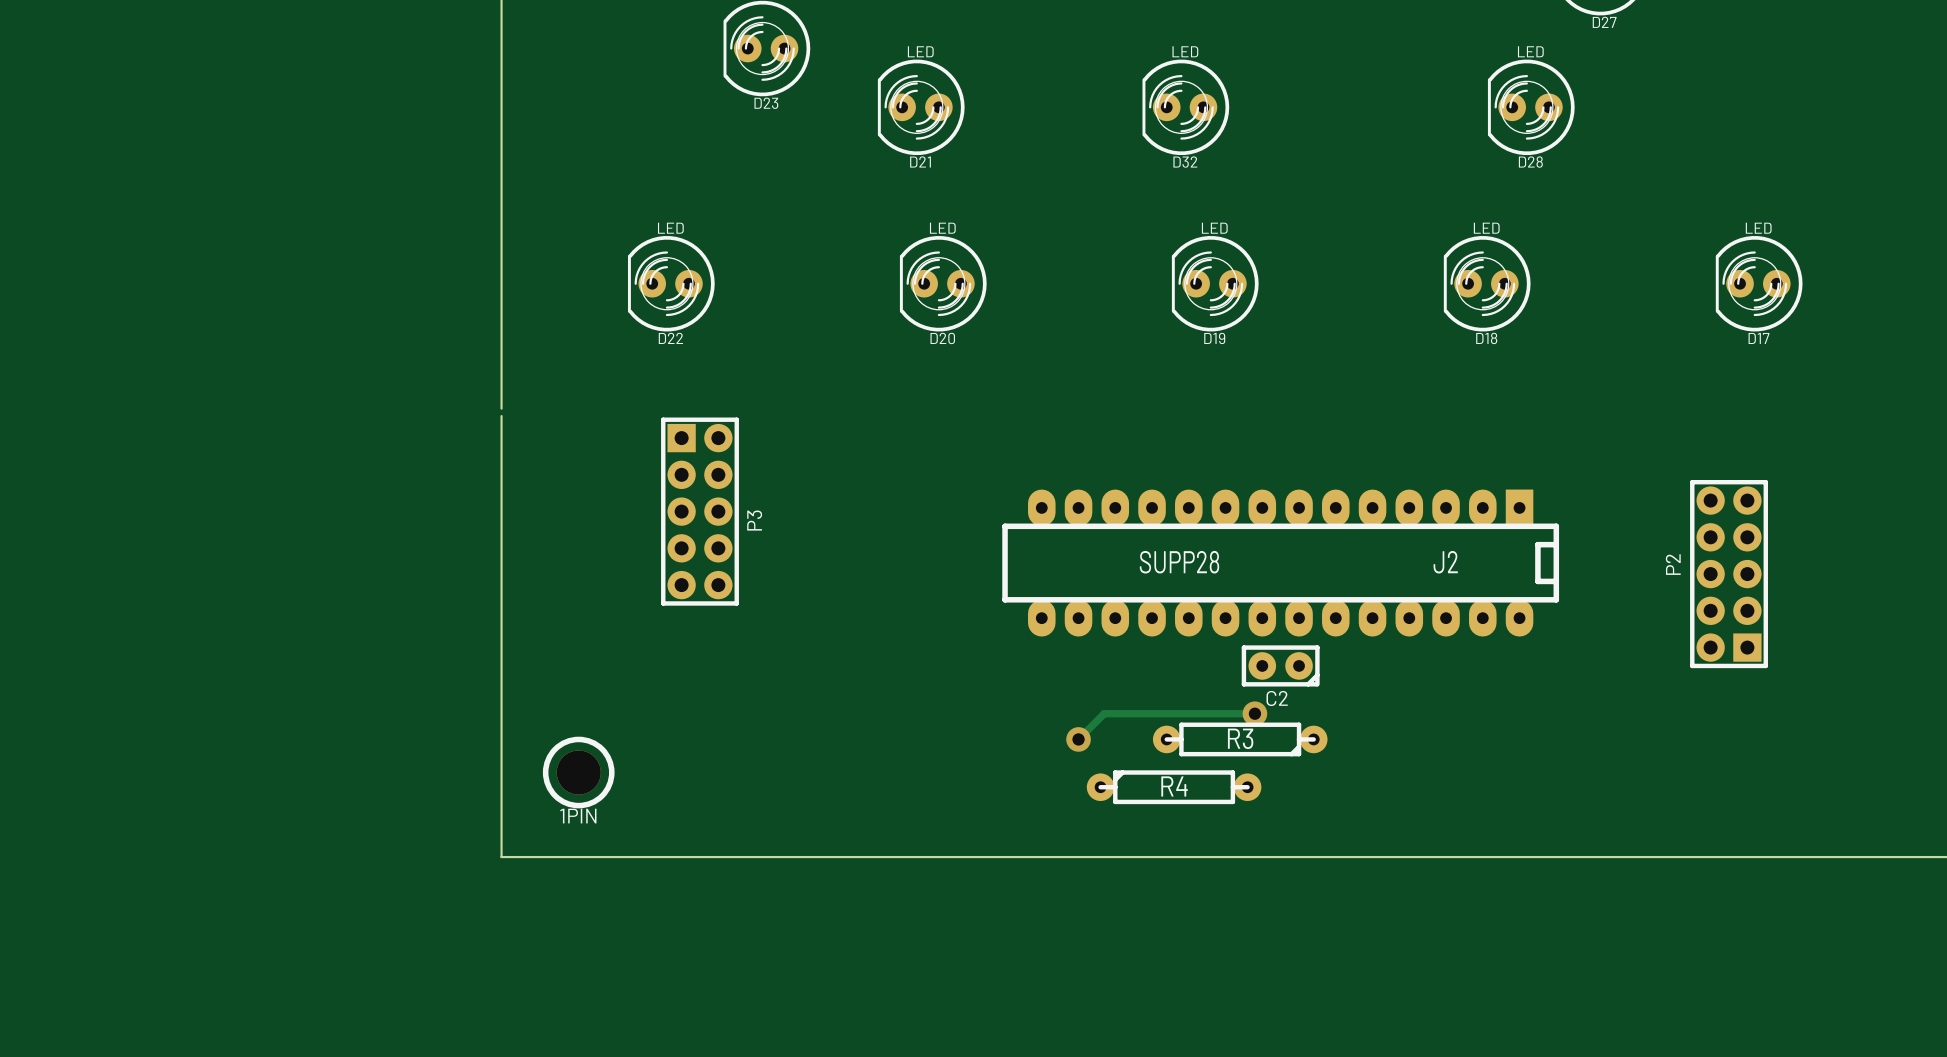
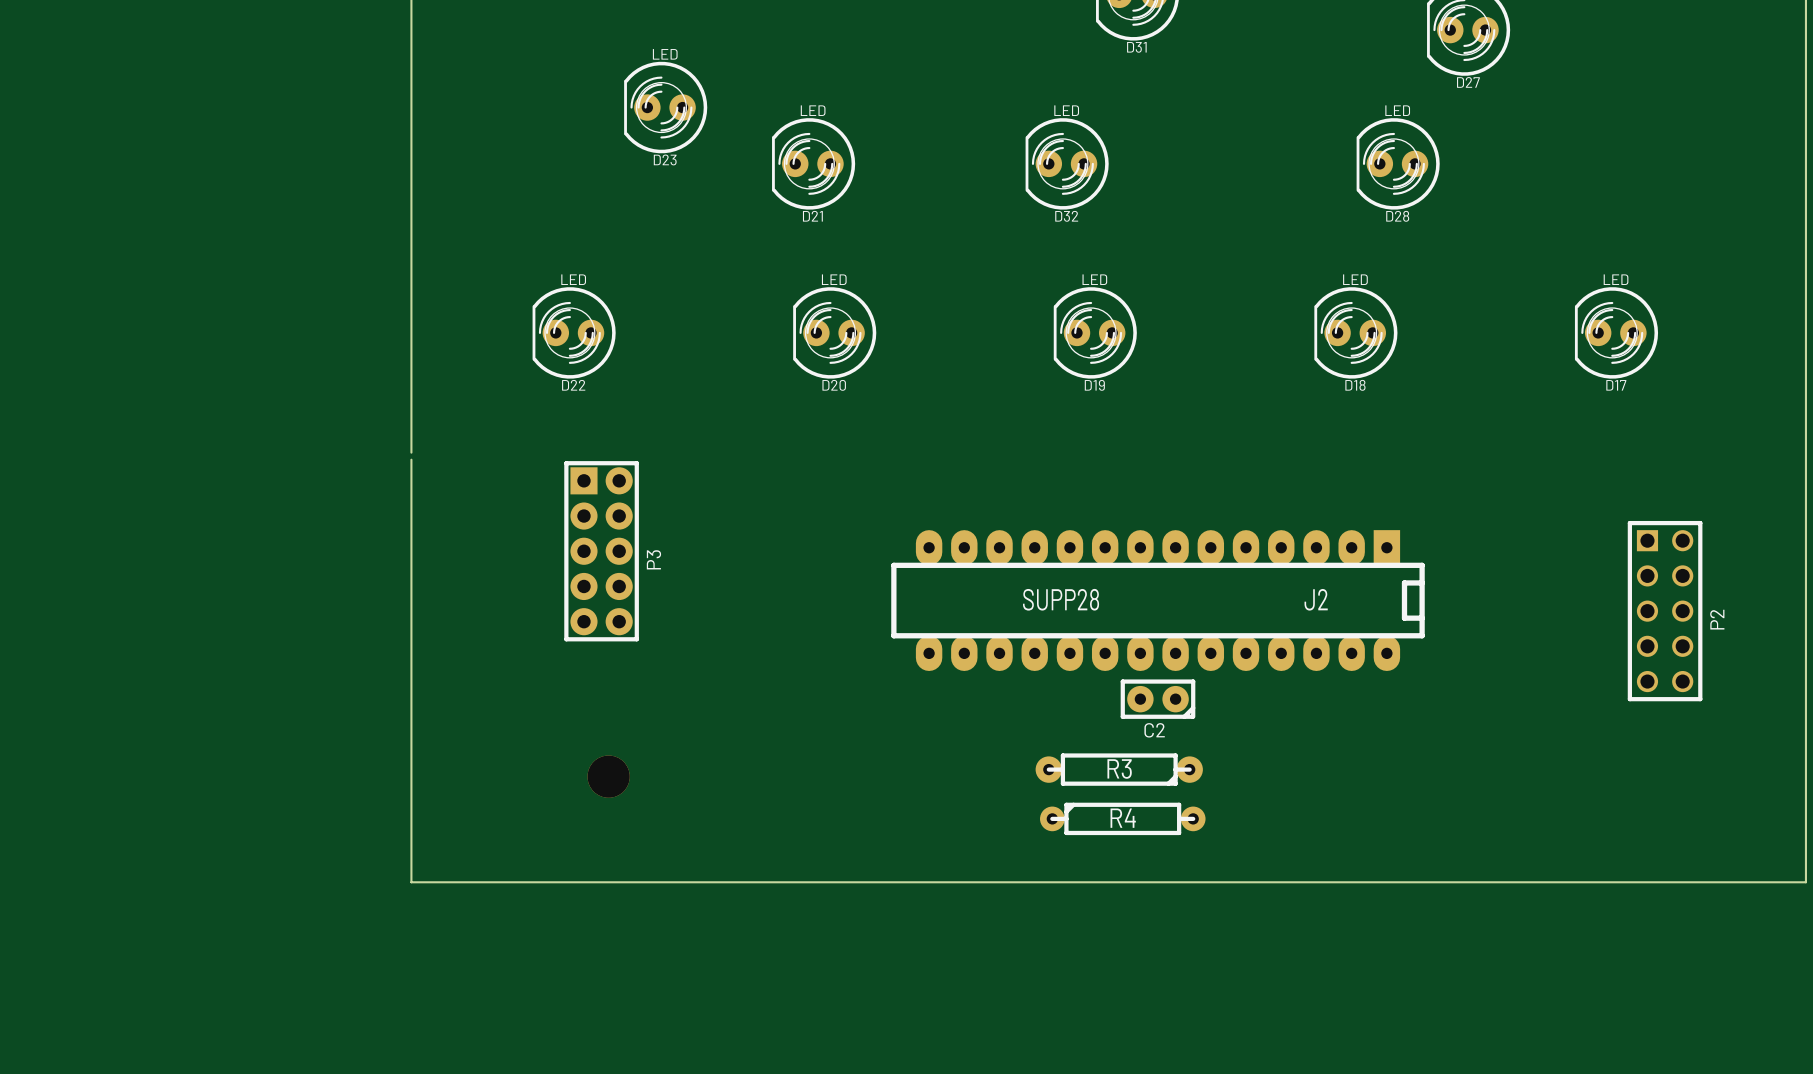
P2 footprint: [1690, 479, 1768, 669] -> [1627, 520, 1703, 702]
P2 name position: P2 (1673, 564) -> P2 (1717, 619)
track: (1254, 713) (1104, 713) (1078, 739) -> none
via: (1254, 713) -> none
via: (1078, 739) -> none
R4 footprint: [1086, 770, 1262, 805] -> [1040, 802, 1206, 836]
1PIN side: top (578, 772) -> bottom (608, 776)

